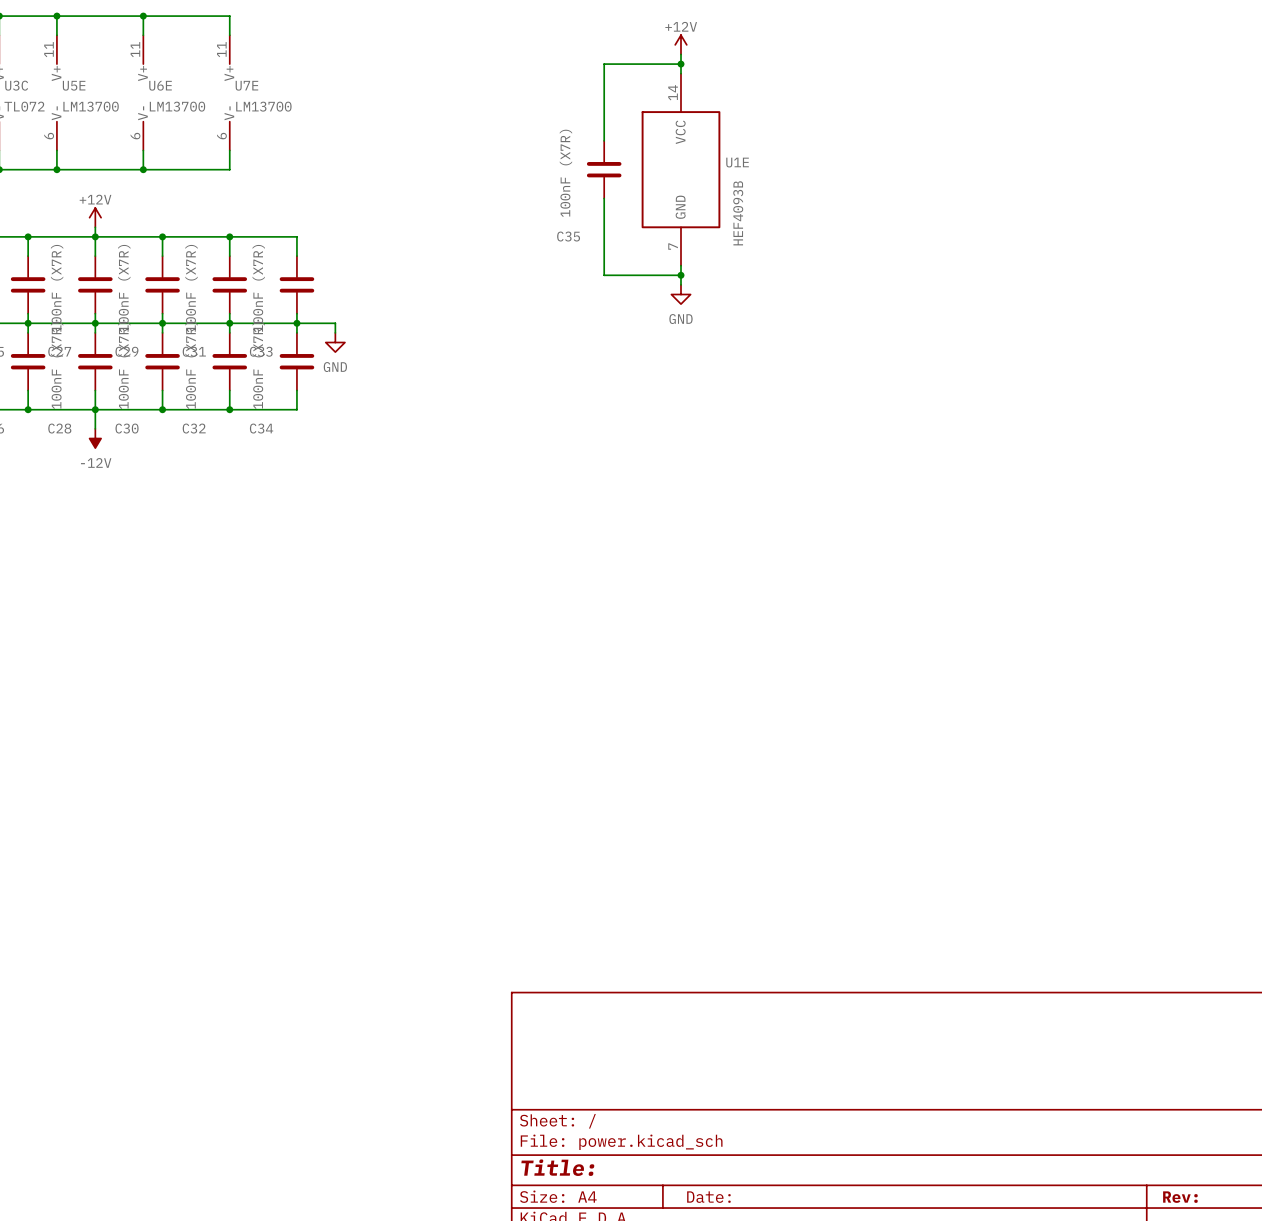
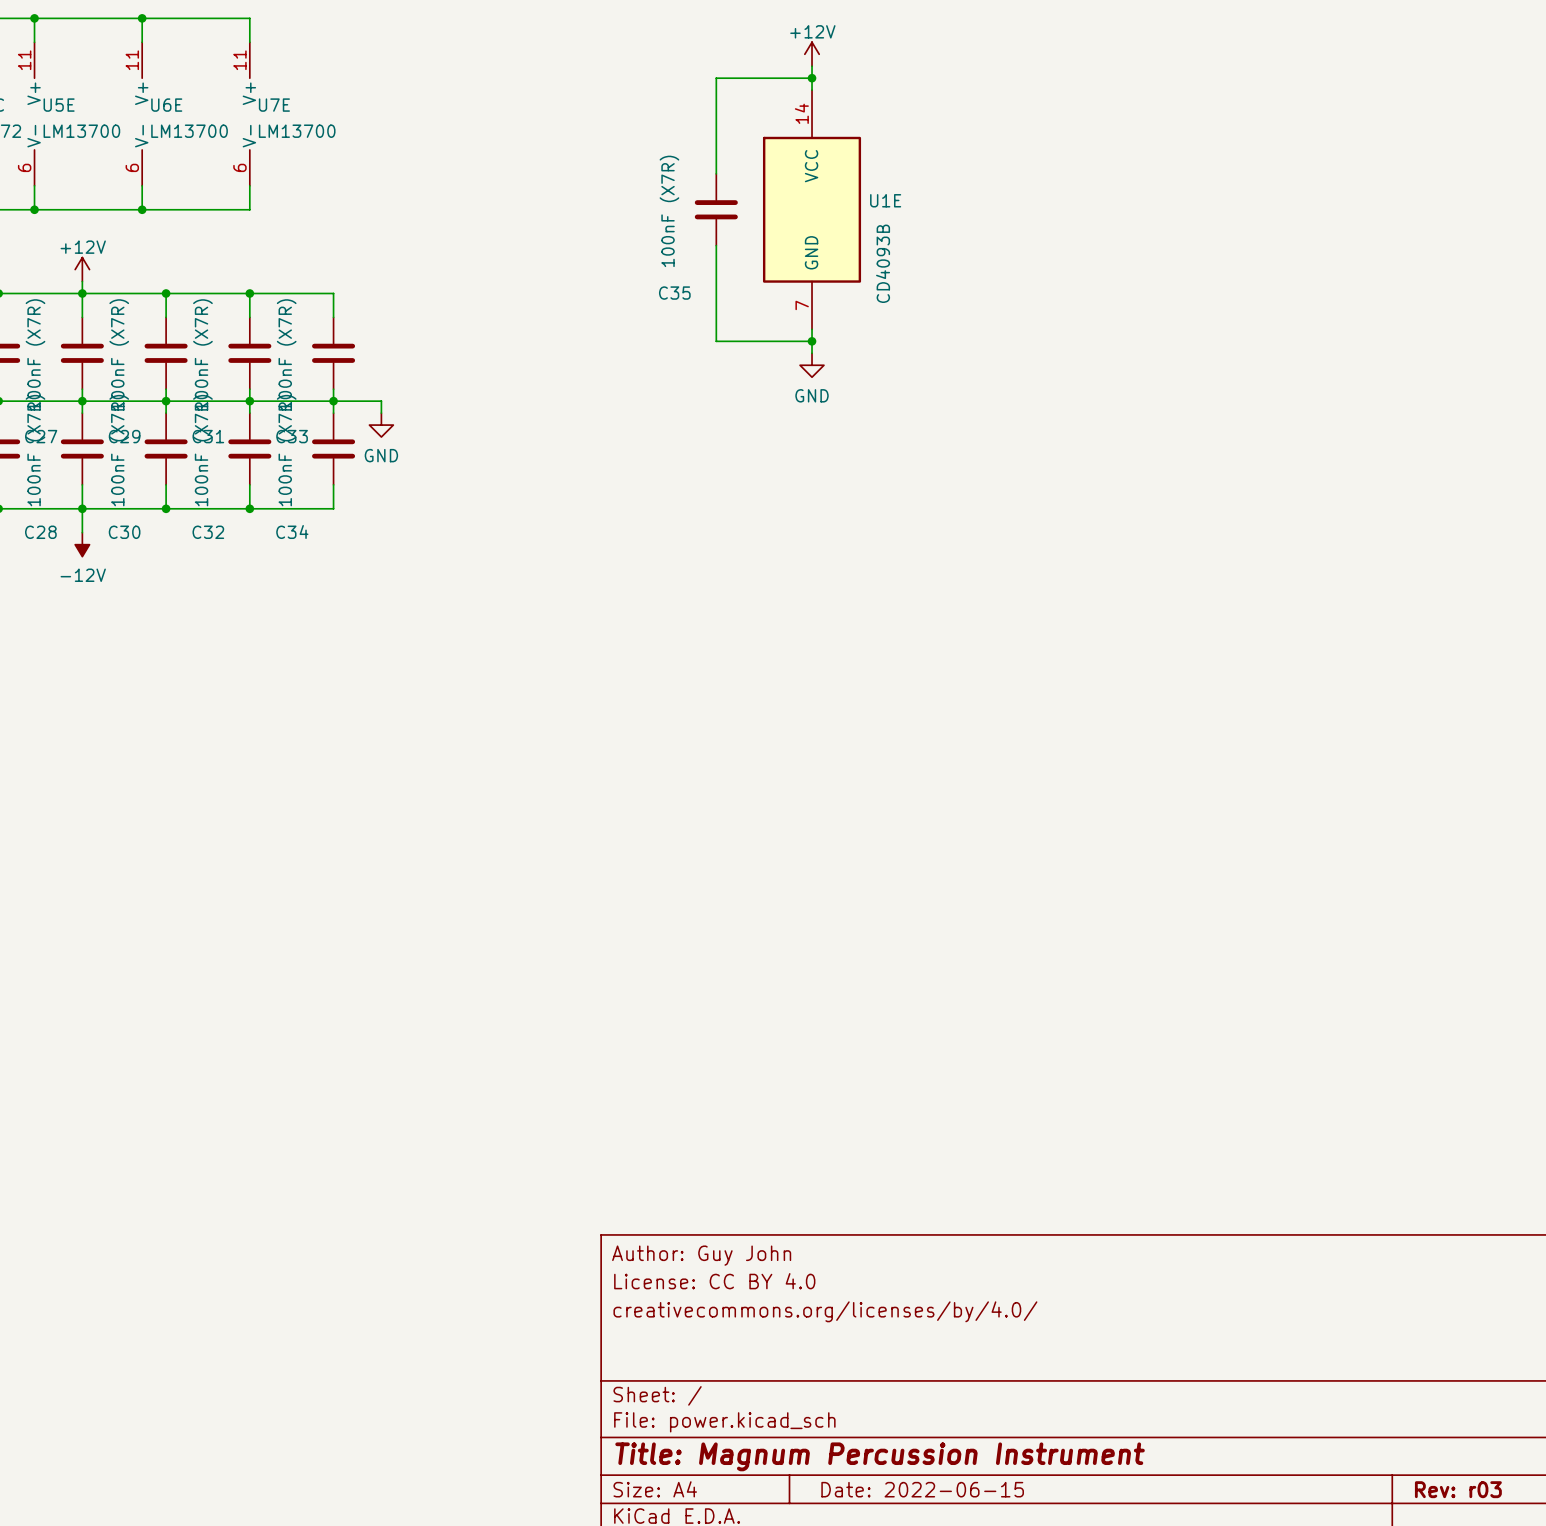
U1E value: HEF4093B (738, 213) -> CD4093B (883, 263)
title block: none -> Author: Guy John (701, 1255)
title block: none -> License: CC BY 4.0 (714, 1281)
title block: none -> creativecommons.org/licenses/by/4.0/ (825, 1311)
title block: Title: (557, 1167) -> Title: Magnum Percussion Instrument (880, 1456)
title block: Date: (708, 1197) -> Date: 2022-06-15 (922, 1489)
title block: Rev: (1180, 1197) -> Rev: r03 (1458, 1489)

